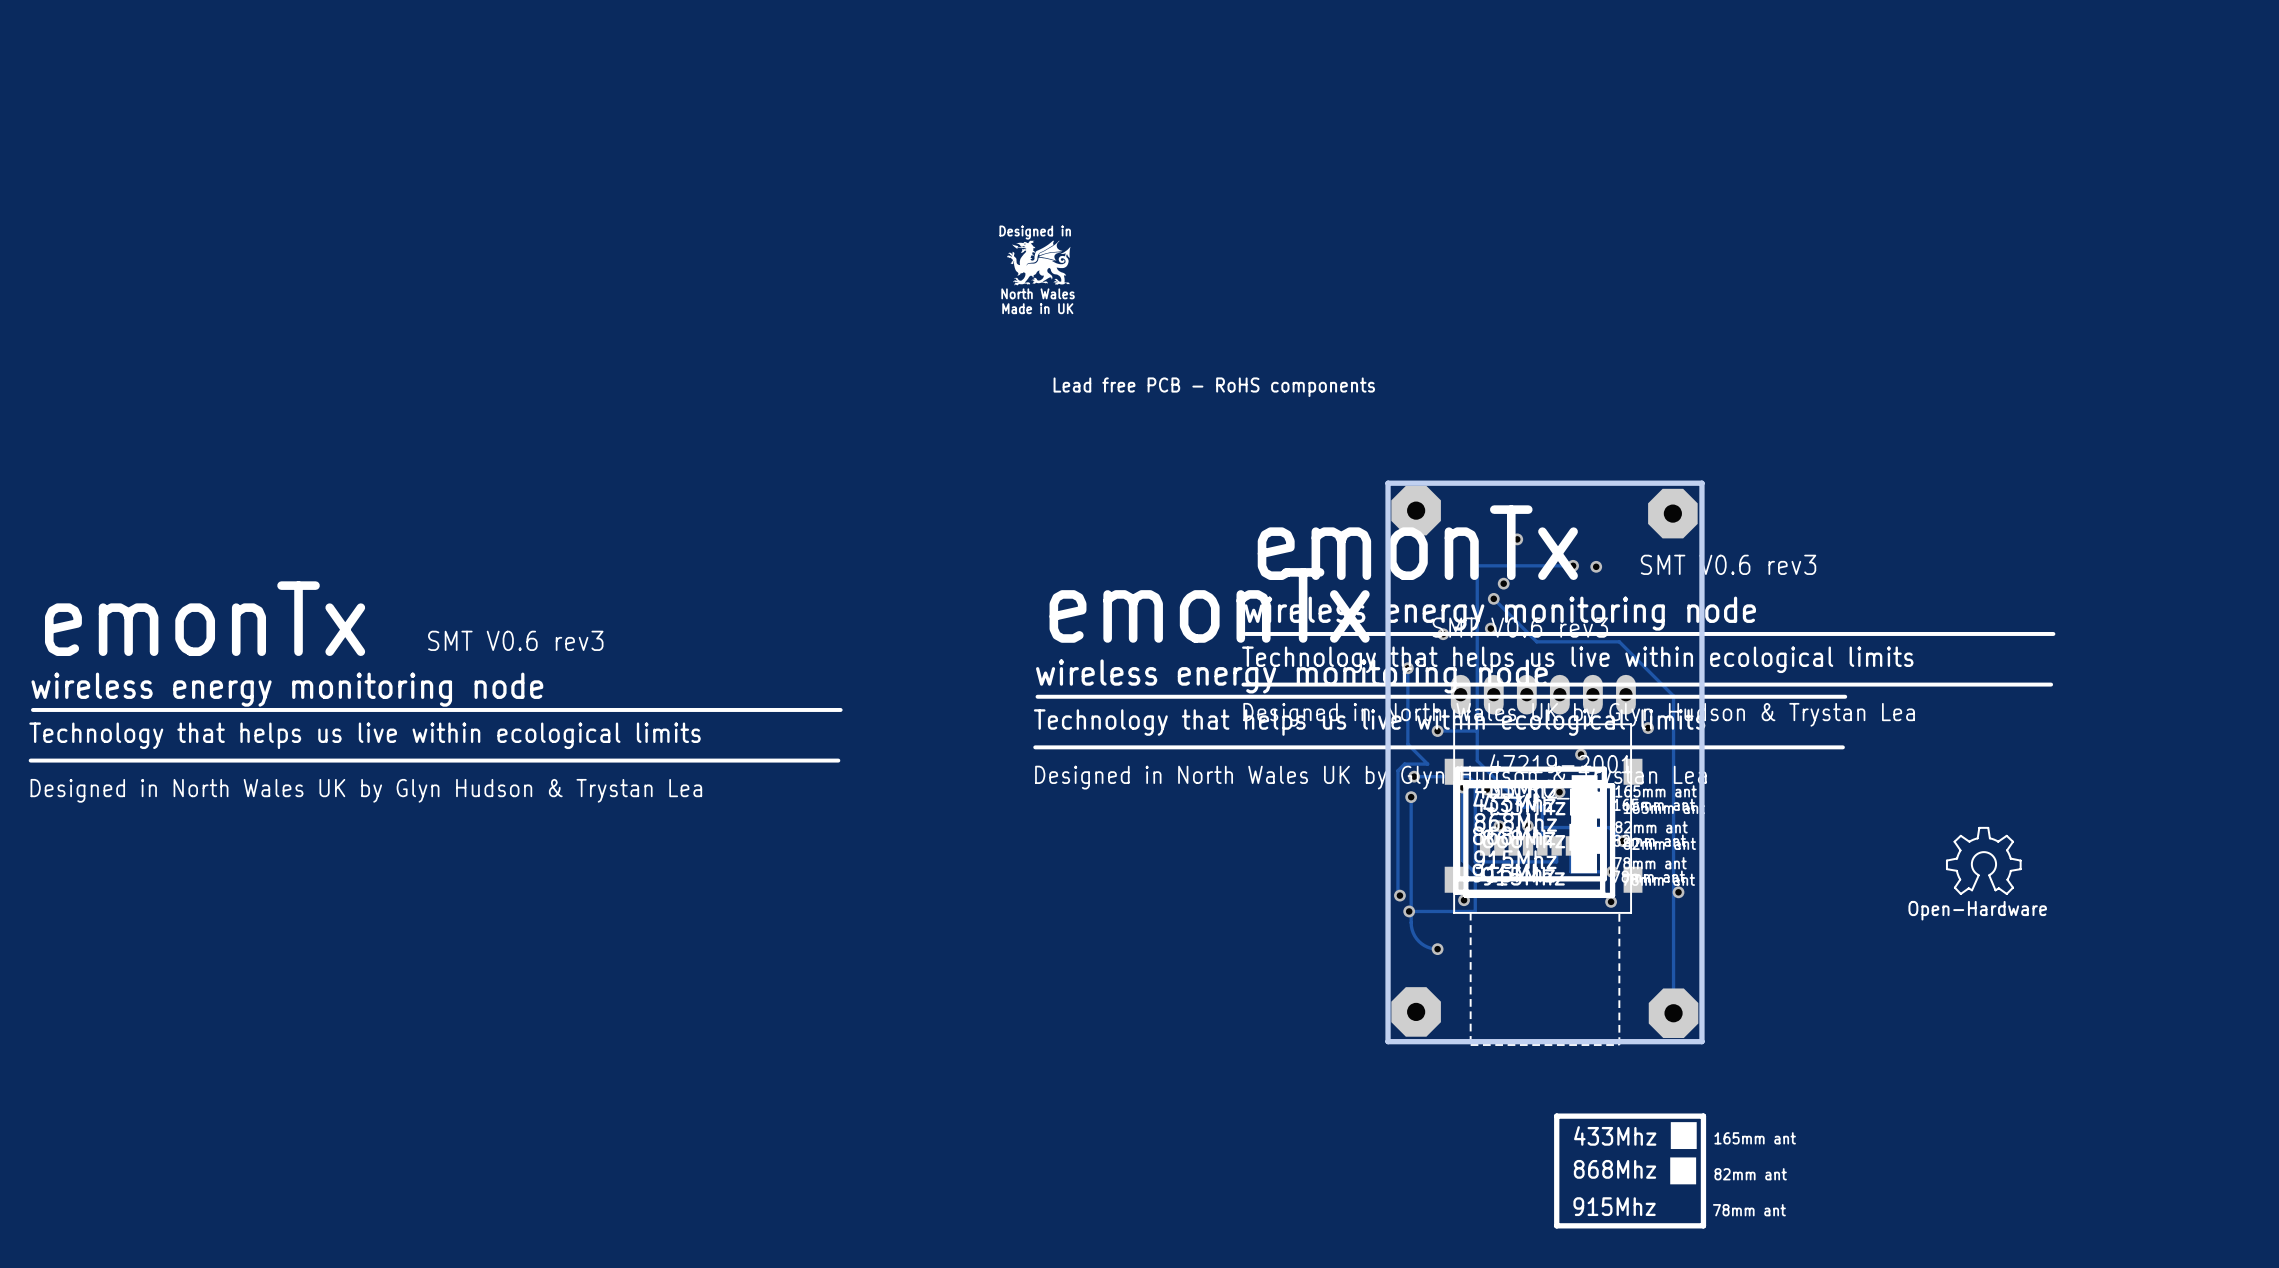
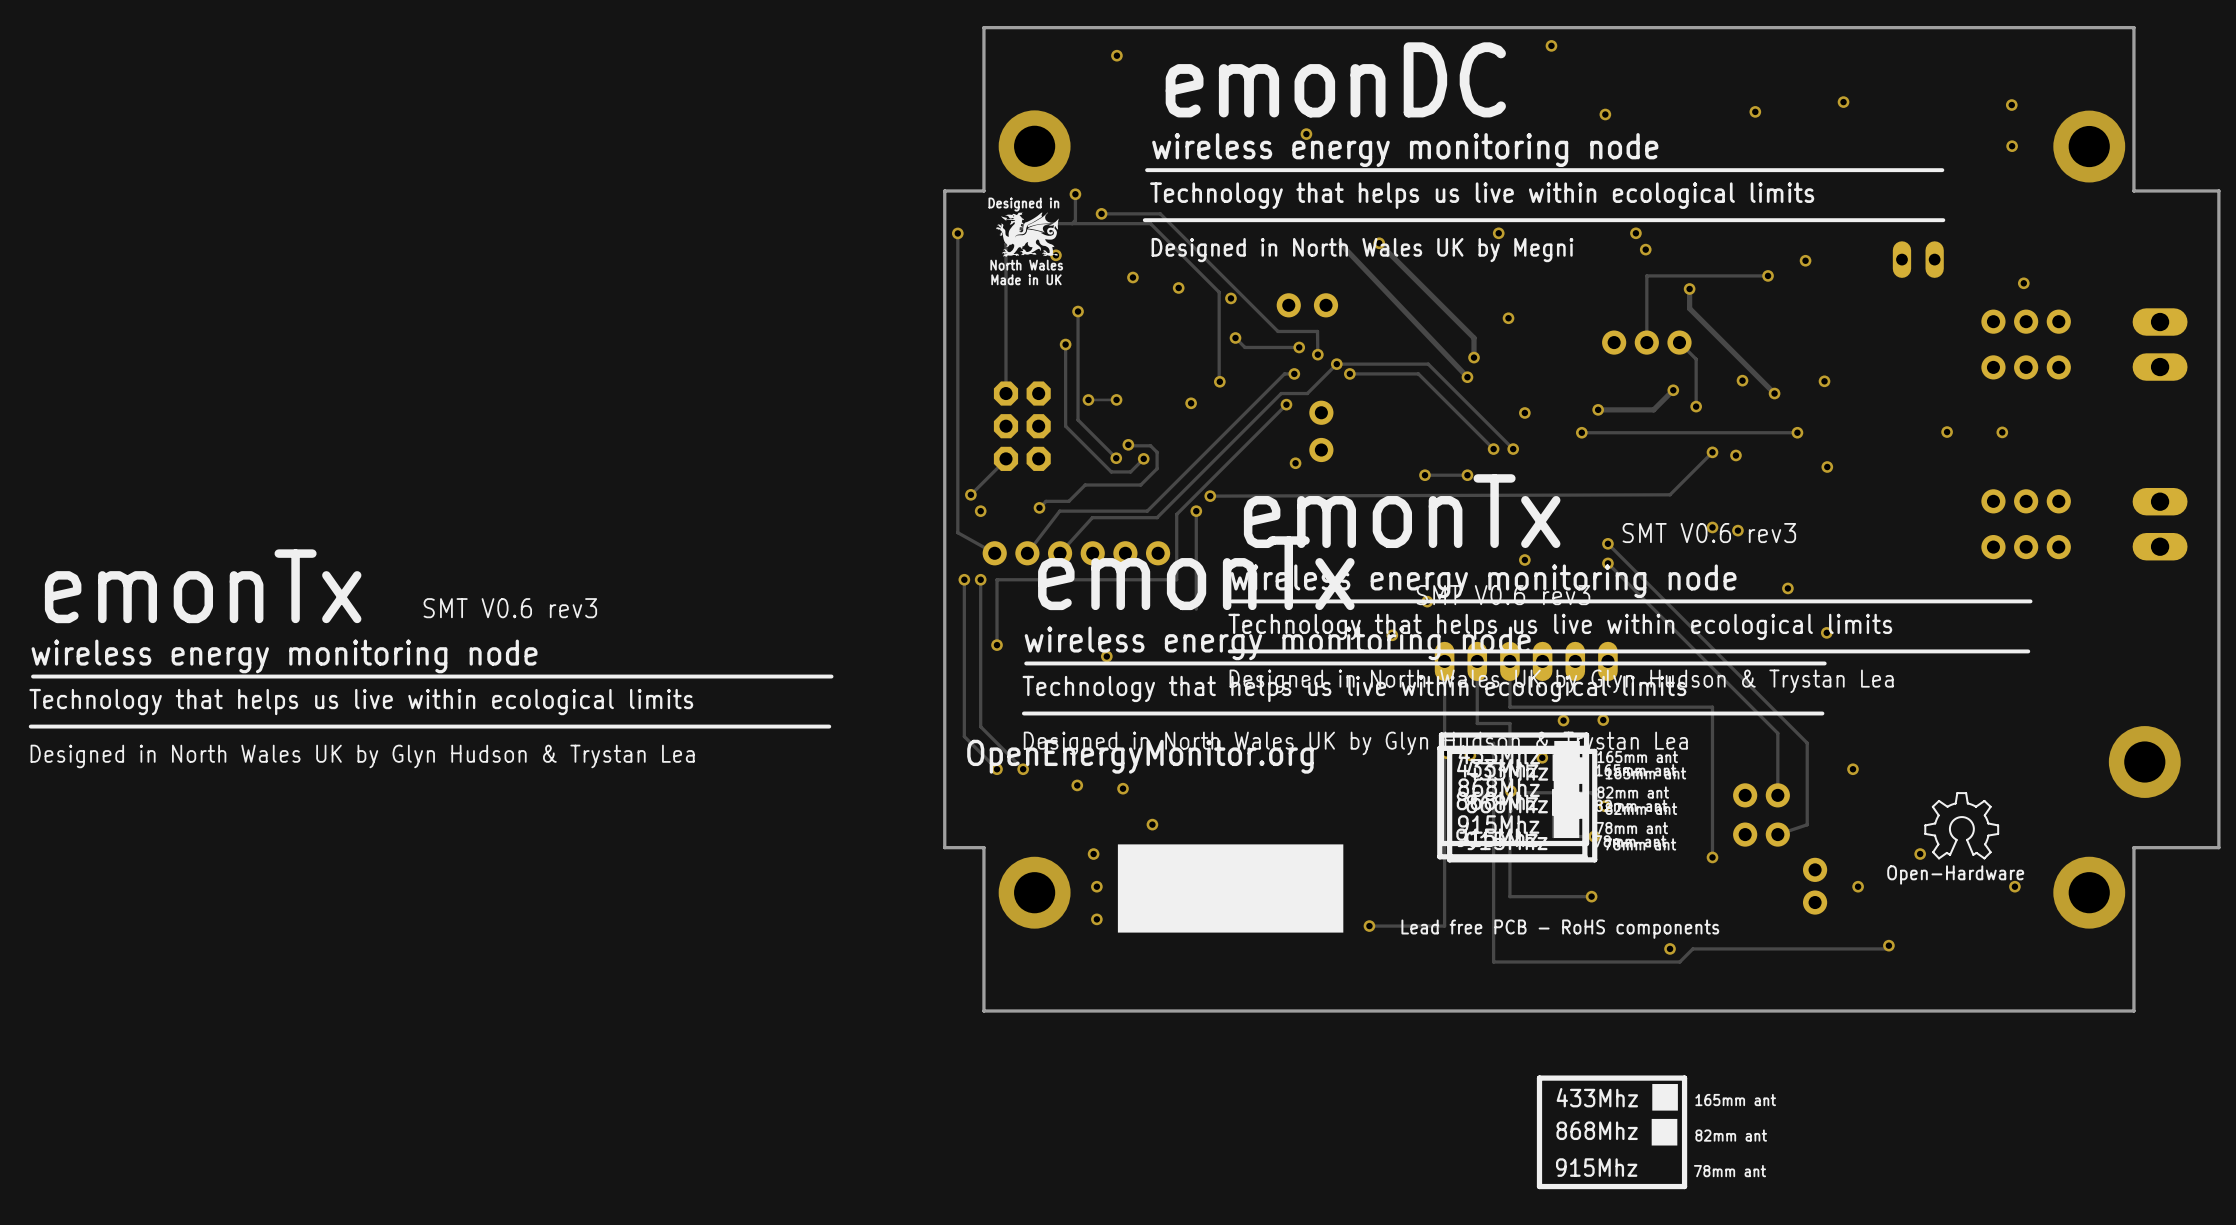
board edge: none -> (2133, 27) (2133, 190) (2218, 190) (2218, 847) (2133, 847) (2133, 1011) (983, 1011) (983, 847) (944, 847) (944, 190) (983, 190) (983, 27) (2133, 27)
via: none -> (1551, 45)
via: none -> (1116, 55)
text: none -> emonDC (1335, 79)
via: none -> (1843, 102)
via: none -> (2011, 105)
via: none -> (1755, 111)
via: none -> (1605, 114)
via: none -> (1306, 134)
via: none -> (1034, 146)
via: none -> (2012, 146)
via: none -> (2089, 146)
text: none -> wireless energy monitoring node (1405, 150)
line: none -> (1942, 170) (1147, 170)
track: none -> (1075, 194) (1075, 220) (1072, 223)
via: none -> (1075, 194)
text: none -> Technology that helps us live within ecological limits (1482, 195)
track: none -> (1101, 213) (1160, 213) (1277, 331) (1317, 331) (1317, 354)
via: none -> (1101, 213)
line: none -> (1943, 220) (1144, 220)
track: none -> (957, 233) (957, 532) (994, 553)
via: none -> (957, 233)
via: none -> (1498, 233)
via: none -> (1635, 233)
track: none -> (1340, 243) (1467, 377)
track: none -> (1379, 243) (1474, 337) (1474, 357)
via: none -> (1379, 243)
text: none -> Designed in North Wales UK by Megni (1362, 250)
via: none -> (1645, 249)
via: none -> (1055, 255)
part: none -> (1918, 259)
via: none -> (1805, 260)
track: none -> (1768, 275) (1646, 275) (1646, 342)
via: none -> (1768, 275)
via: none -> (1132, 277)
via: none -> (2023, 283)
via: none -> (1178, 287)
track: none -> (1689, 288) (1689, 308) (1774, 393)
via: none -> (1689, 288)
via: none -> (1230, 298)
part: none -> (1307, 305)
track: none -> (1078, 311) (1078, 419) (1116, 458)
via: none -> (1078, 311)
via: none -> (1508, 318)
part: none -> (2026, 321)
track: none -> (1235, 337) (1244, 347) (1299, 347)
via: none -> (1235, 337)
part: none -> (1646, 342)
track: none -> (1679, 342) (1696, 359) (1696, 406)
track: none -> (1065, 344) (1065, 426) (1111, 471) (1130, 471) (1143, 458)
via: none -> (1065, 344)
part: none -> (2160, 344)
via: none -> (1299, 347)
via: none -> (1317, 354)
text: Lead free PCB - RoHS components (1214, 387) -> none
via: none -> (1474, 357)
via: none -> (1336, 364)
part: none -> (2026, 367)
track: none -> (1294, 373) (1284, 373) (1147, 511) (1059, 511) (1027, 553)
via: none -> (1294, 373)
track: none -> (1349, 373) (1418, 373) (1493, 449)
via: none -> (1349, 373)
via: none -> (1467, 377)
via: none -> (1742, 380)
track: none -> (1219, 381) (1219, 292) (1150, 223) (1026, 223) (1005, 244) (1005, 393)
via: none -> (1219, 381)
via: none -> (1824, 381)
track: none -> (1673, 390) (1653, 409) (1598, 409)
via: none -> (1673, 390)
via: none -> (1774, 393)
via: none -> (1088, 399)
track: none -> (1116, 399) (1088, 399)
via: none -> (1116, 399)
via: none -> (1191, 403)
track: none -> (1286, 404) (1176, 514) (1176, 579) (997, 579) (997, 645)
via: none -> (1286, 404)
via: none -> (1696, 406)
via: none -> (1598, 409)
via: none -> (1524, 412)
part: none -> (1022, 426)
part: none -> (1321, 431)
via: none -> (1947, 432)
via: none -> (1581, 432)
track: none -> (1797, 432) (1581, 432)
via: none -> (1797, 432)
via: none -> (2002, 432)
track: none -> (1128, 444) (1150, 445) (1157, 452) (1157, 468) (1140, 485) (1085, 485) (1068, 501) (1046, 501) (1039, 507)
via: none -> (1128, 444)
via: none -> (1493, 449)
track: none -> (1513, 449) (1428, 364) (1336, 364) (1307, 393) (1281, 393) (1157, 517) (1092, 517) (1060, 553)
via: none -> (1513, 449)
board edge: (1701, 483) (1388, 483) (1388, 1041) (1701, 1041) (1701, 483) -> none
track: none -> (1712, 452) (1670, 494) (1210, 496)
via: none -> (1712, 452)
via: none -> (1735, 455)
track: none -> (1005, 458) (970, 494)
via: none -> (1116, 458)
via: none -> (1143, 458)
via: none -> (1295, 463)
via: none -> (1827, 467)
via: none -> (1424, 475)
track: none -> (1467, 475) (1424, 475)
via: none -> (1467, 475)
part: (1416, 510) -> none
part: (1672, 513) -> none
via: none -> (970, 494)
via: none -> (1210, 496)
part: none -> (2026, 501)
via: none -> (1039, 507)
via: (1517, 539) -> none
via: none -> (980, 511)
track: none -> (1196, 511) (1196, 609)
via: none -> (1196, 511)
part: none -> (2160, 524)
via: none -> (1712, 527)
via: none -> (1737, 530)
track: (1573, 565) (1477, 565) (1477, 760) (1523, 807) (1542, 807) (1542, 845) -> none
via: (1573, 565) -> none
via: (1596, 566) -> none
track: none -> (1607, 543) (1807, 743) (1807, 824) (1777, 834)
via: none -> (1607, 543)
part: none -> (2026, 547)
via: (1503, 583) -> none
part: none -> (1076, 553)
via: none -> (1524, 560)
track: none -> (1607, 563) (1777, 733) (1777, 795)
via: none -> (1607, 563)
track: (1493, 598) (1536, 641) (1619, 641) (1673, 696) (1673, 1013) -> none
via: (1493, 598) -> none
track: none -> (964, 579) (964, 736) (997, 769)
via: none -> (964, 579)
track: none -> (980, 579) (980, 726) (1023, 769)
via: none -> (980, 579)
via: none -> (1787, 588)
via: (1490, 628) -> none
via: none -> (1826, 632)
track: (1407, 668) (1407, 744) (1427, 764) (1404, 764) (1397, 770) (1397, 893) (1399, 895) -> none
via: none -> (997, 645)
via: none -> (1106, 656)
track: none -> (1444, 661) (1444, 926) (1369, 926)
track: none -> (1477, 661) (1477, 723) (1509, 723) (1509, 896) (1591, 896)
track: none -> (1509, 661) (1509, 707) (1712, 707) (1712, 857)
via position: (1648, 728) -> (1603, 720)
via: (1437, 731) -> none
track: (1477, 731) (1437, 731) -> none
track: (1414, 776) (1468, 776) (1475, 783) (1475, 861) (1556, 861) (1556, 845) -> none
via: (1414, 776) -> none
track: none -> (1493, 743) (1493, 961) (1679, 961) (1692, 948) (1888, 948) (1888, 945)
track: (1462, 787) (1462, 860) (1475, 873) (1475, 911) (1409, 911) -> none
text: none -> OpenEnergyMonitor.org (1140, 756)
via: none -> (2144, 762)
track: (1411, 797) (1411, 926) (1414, 935) (1421, 943) (1437, 949) -> none
via: (1411, 797) -> none
via: none -> (997, 769)
via: none -> (1023, 769)
via: none -> (1852, 769)
via: none -> (1077, 785)
via: none -> (1123, 788)
via: (1499, 826) -> none
part: none -> (1761, 795)
via: none -> (1152, 824)
part: none -> (1761, 834)
drawing: none -> [1117, 844, 1344, 933]
part: (1543, 884) -> none
via: none -> (1093, 854)
via: none -> (1920, 854)
via: (1678, 892) -> none
via: none -> (1712, 857)
via: (1399, 895) -> none
via: (1464, 900) -> none
via position: (1611, 901) -> (1591, 896)
via: (1409, 911) -> none
via: none -> (1096, 886)
part: none -> (1815, 886)
via: none -> (1858, 886)
via: none -> (2014, 886)
via: none -> (1034, 892)
via: none -> (2089, 892)
via: (1437, 949) -> none
via: none -> (1096, 919)
via: none -> (1369, 926)
text: none -> Lead free PCB - RoHS components (1560, 929)
via: none -> (1888, 945)
via: none -> (1670, 948)
part: (1416, 1011) -> none
part: (1673, 1013) -> none

